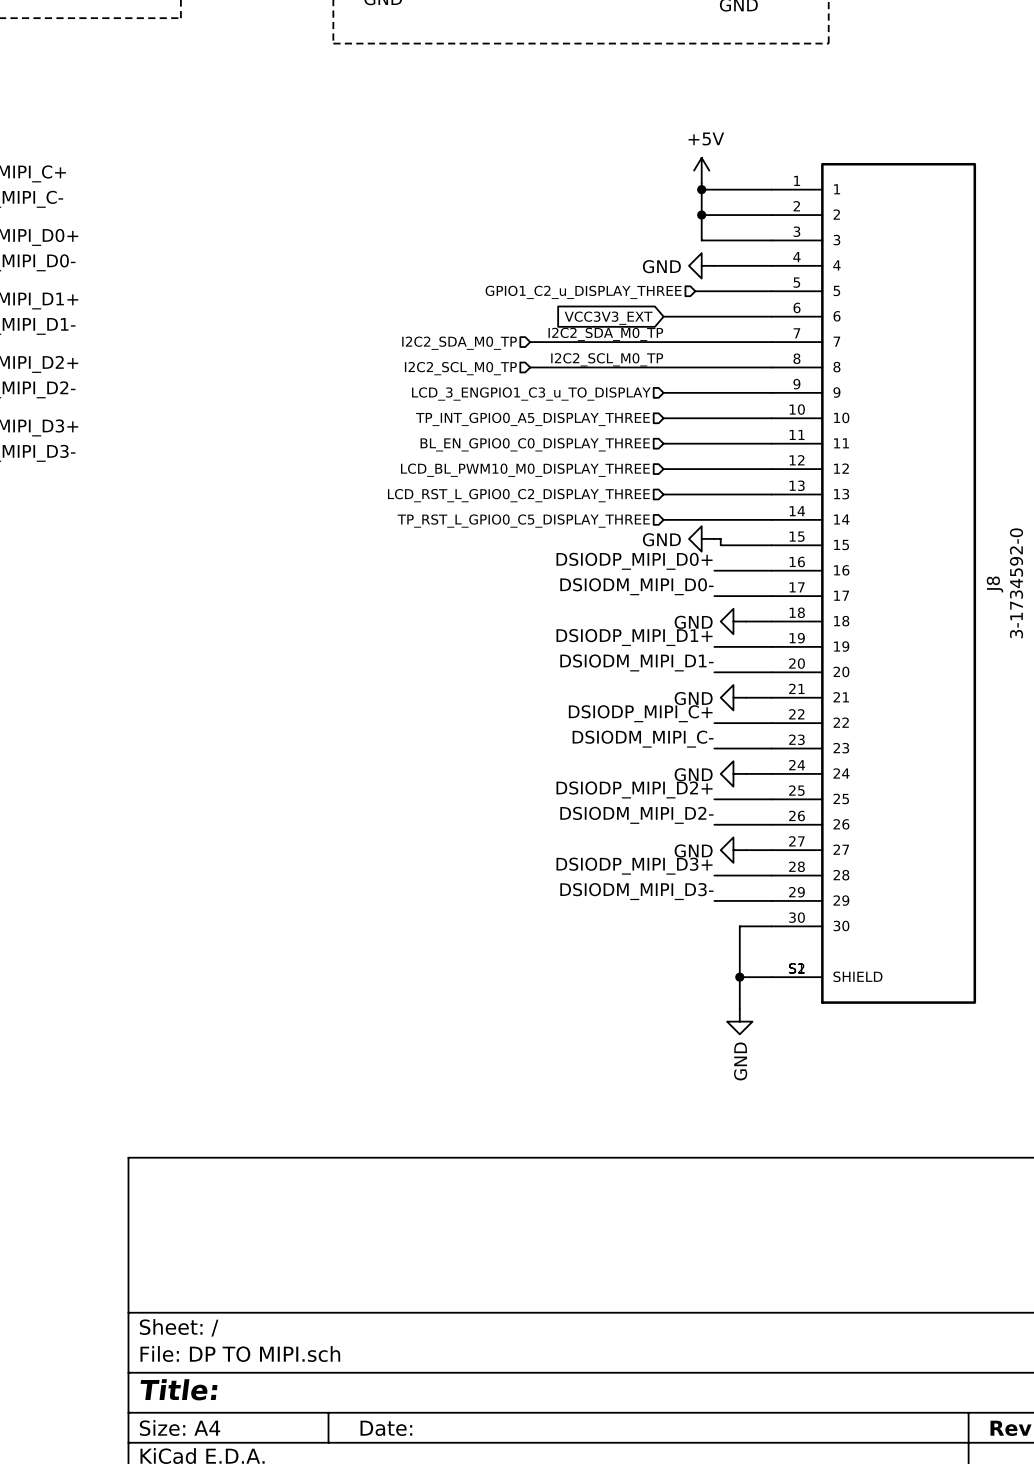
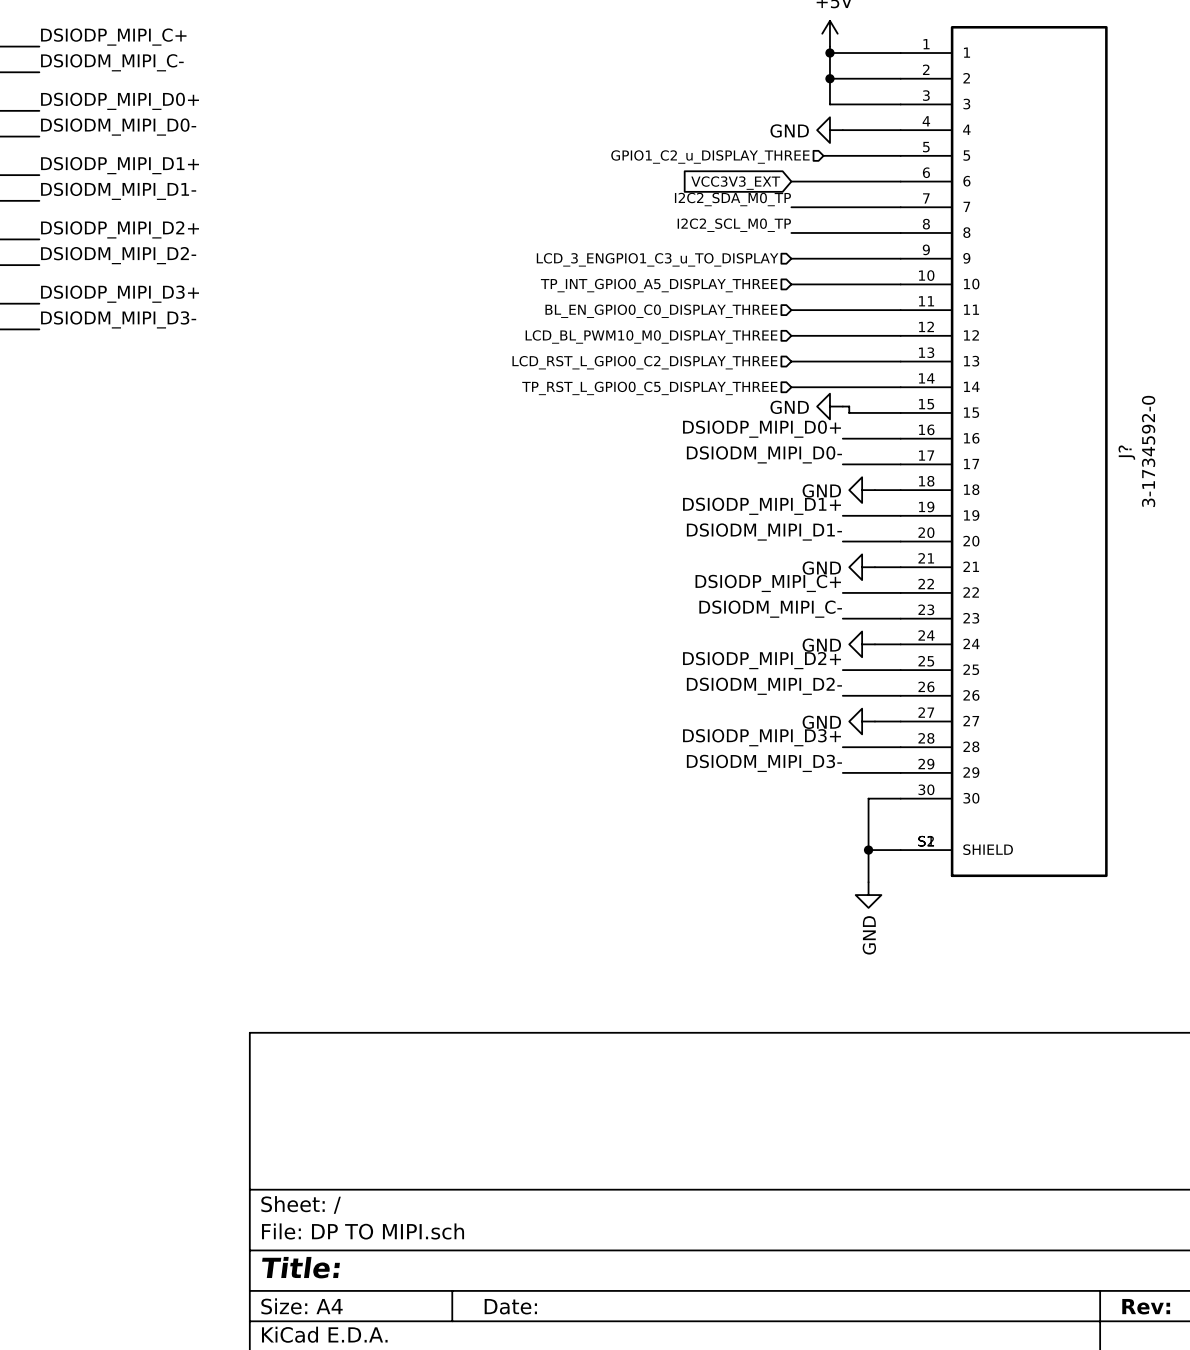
wire: (530, 342) (663, 342) -> none
hierarchical label: I2C2_SDA_M0_TP (459, 343) -> none
wire: (530, 367) (663, 367) -> none
hierarchical label: I2C2_SCL_M0_TP (460, 368) -> none
J8 name: J8 (995, 584) -> J? (1126, 452)

